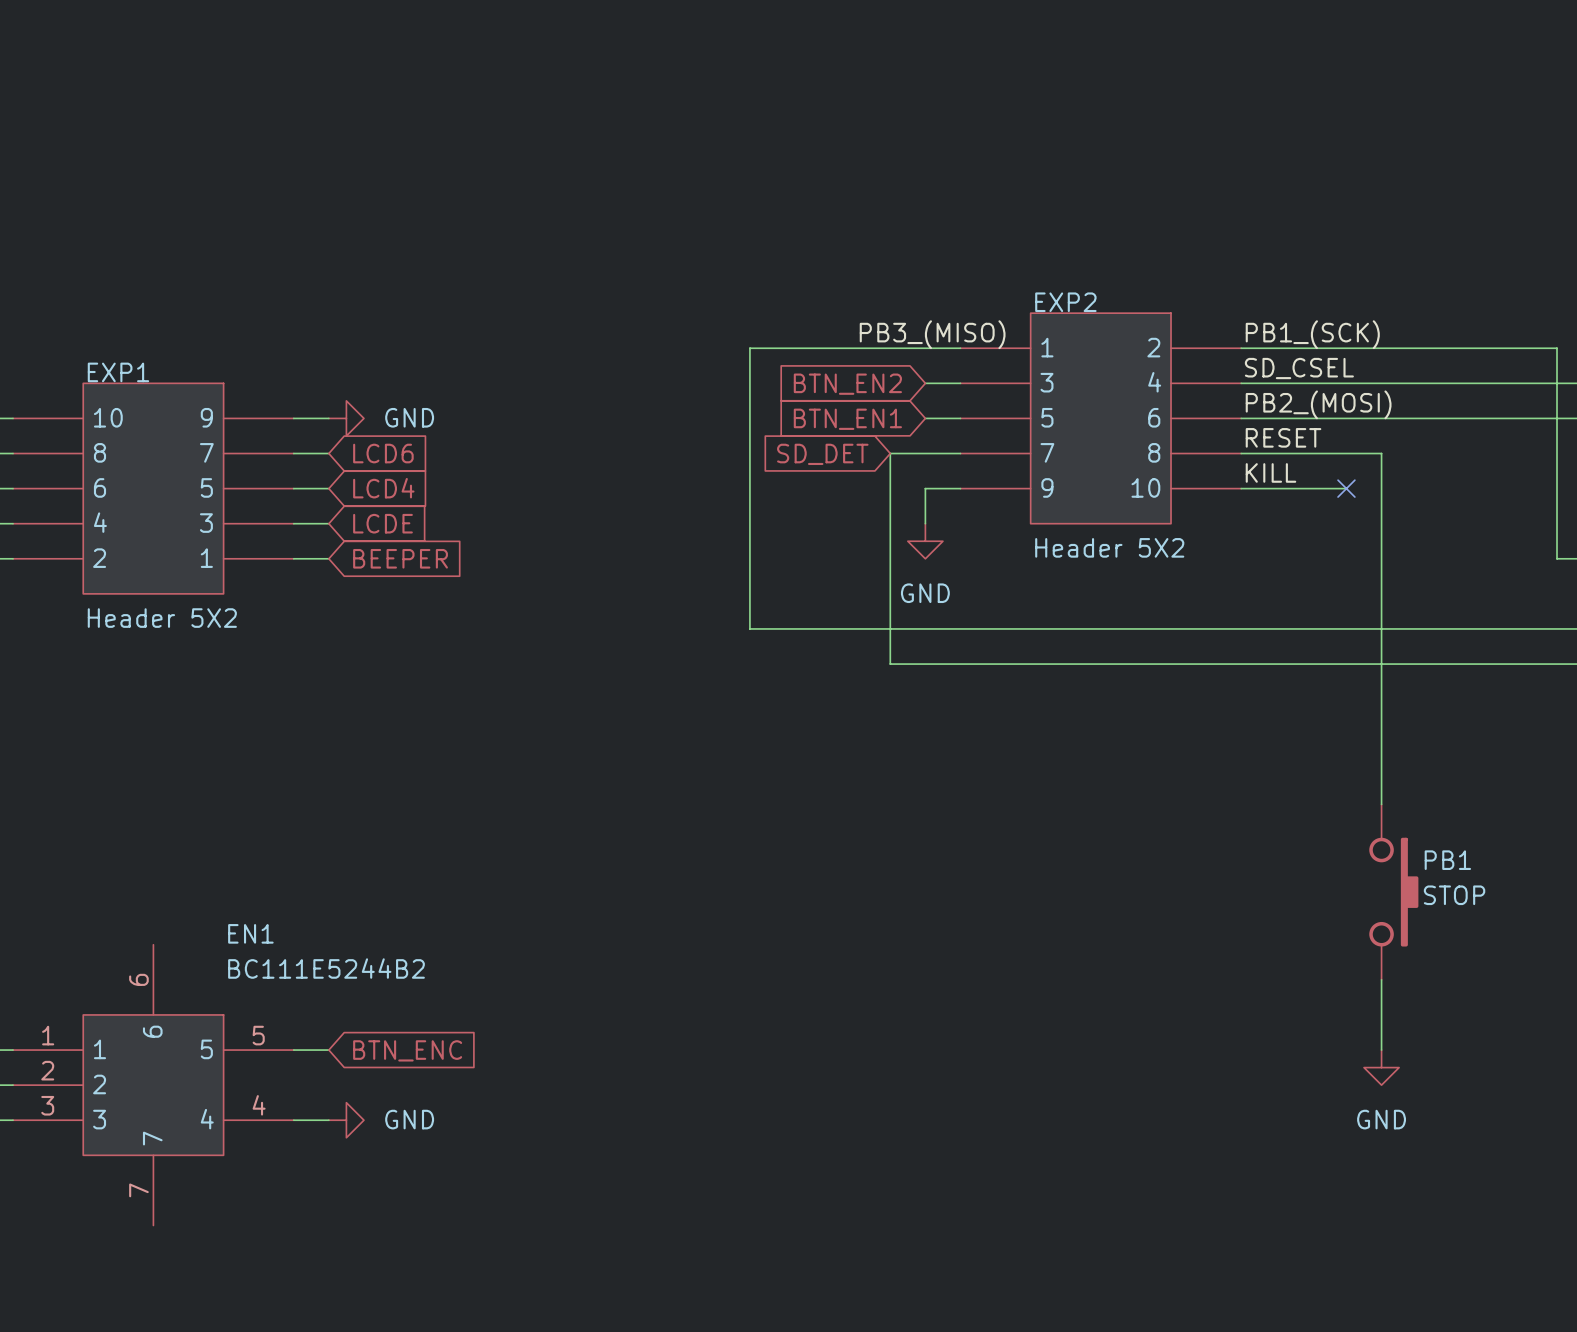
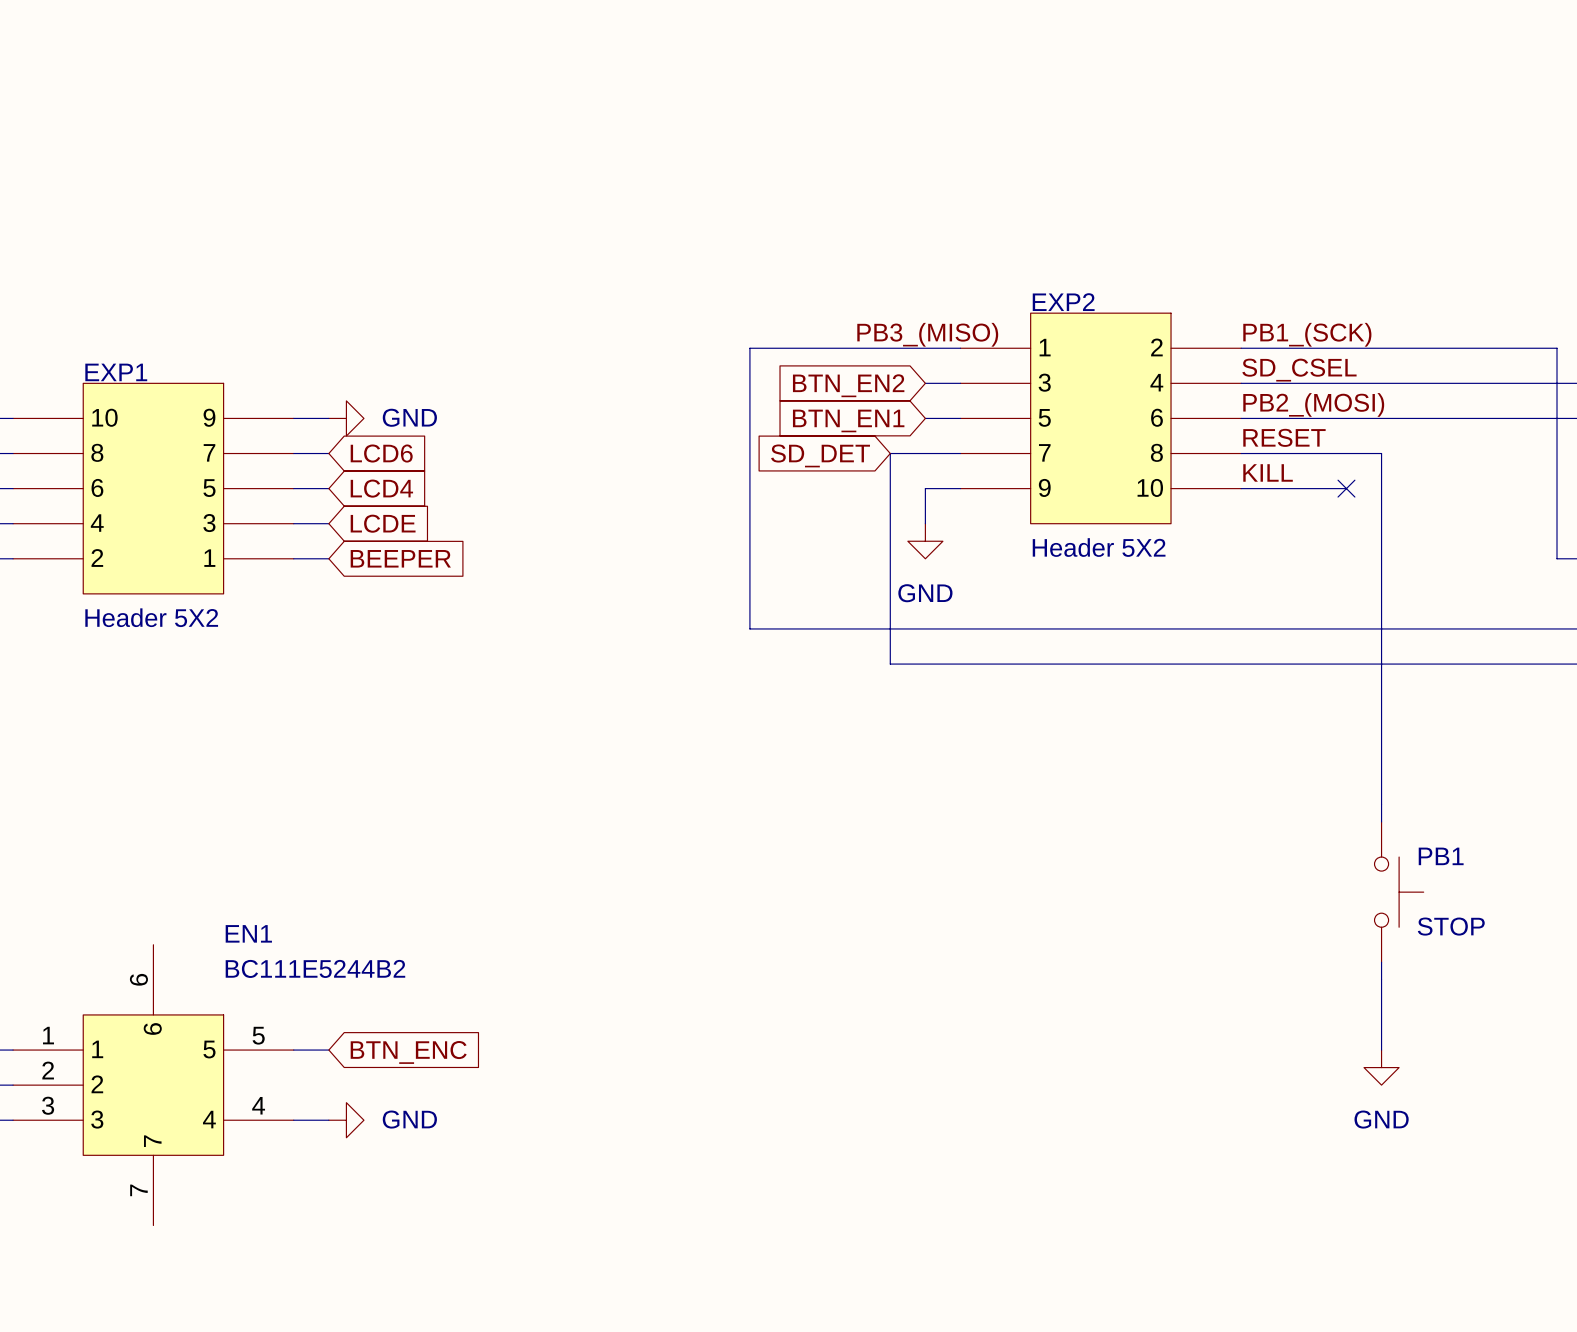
PB1 symbol: [1369, 804, 1419, 980] -> [1374, 821, 1424, 963]
PB1 value position: STOP (1454, 895) -> STOP (1451, 926)

